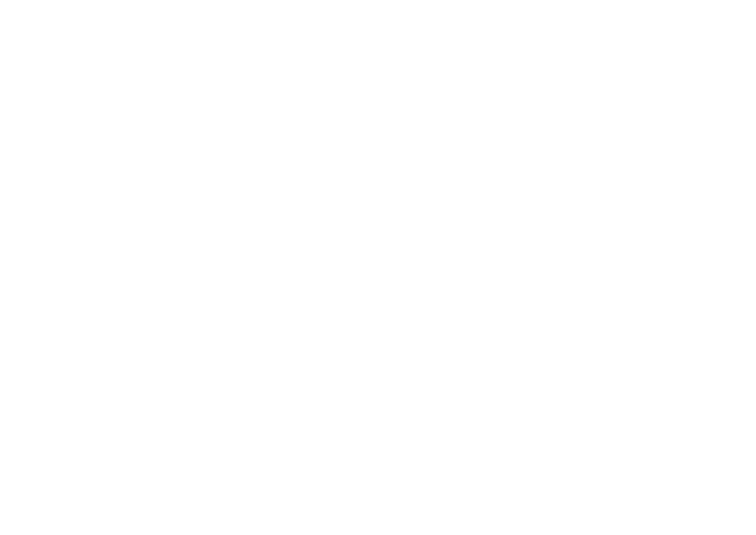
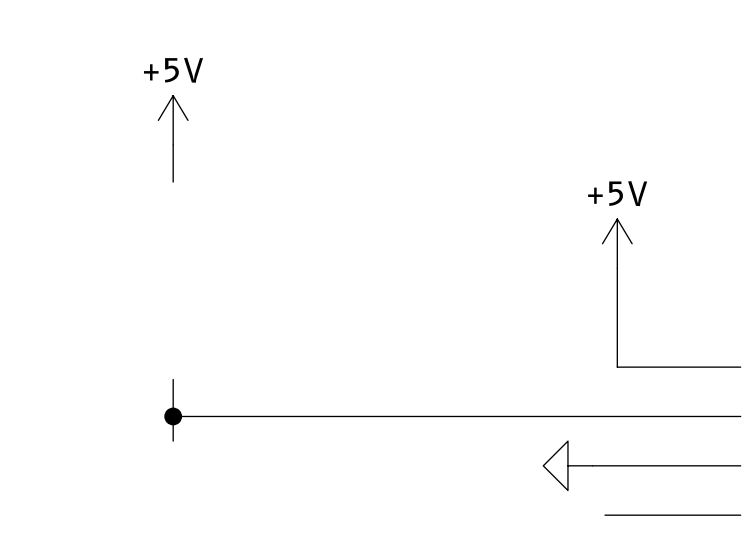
power symbol: none -> +5V (173, 120)
wire: none -> (173, 145) (173, 182)
power symbol: none -> +5V (617, 243)
wire: none -> (617, 268) (617, 367) (740, 367)
wire: none -> (173, 379) (173, 441)
wire: none -> (173, 416) (740, 416)
junction: none -> (173, 416)
power symbol: none -> (567, 465)
wire: none -> (592, 465) (740, 465)
wire: none -> (604, 515) (740, 515)

